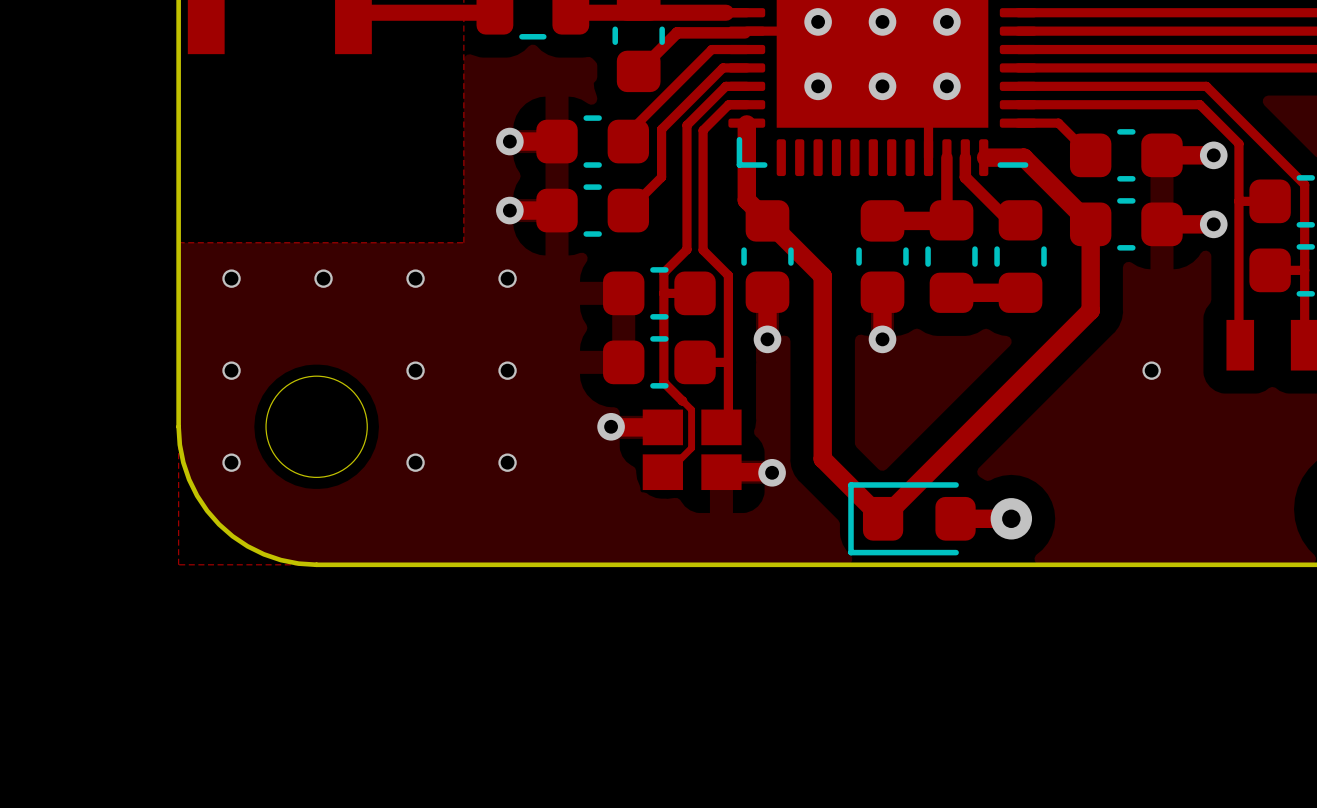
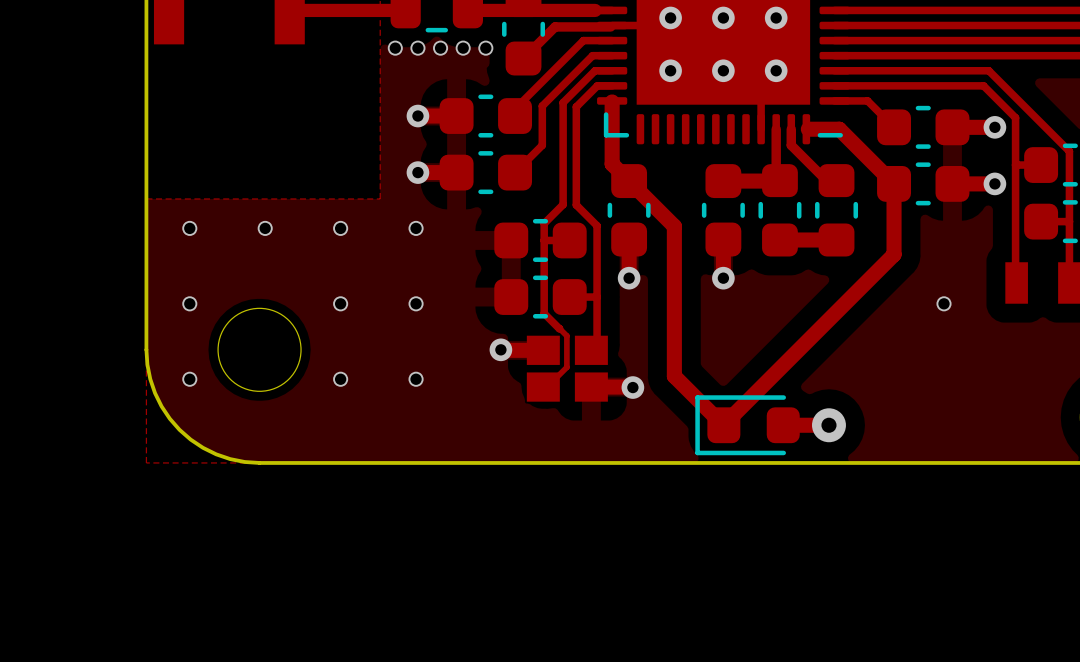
via: none -> (395, 48)
via: none -> (417, 48)
via: none -> (440, 48)
via: none -> (463, 48)
via: none -> (485, 48)

